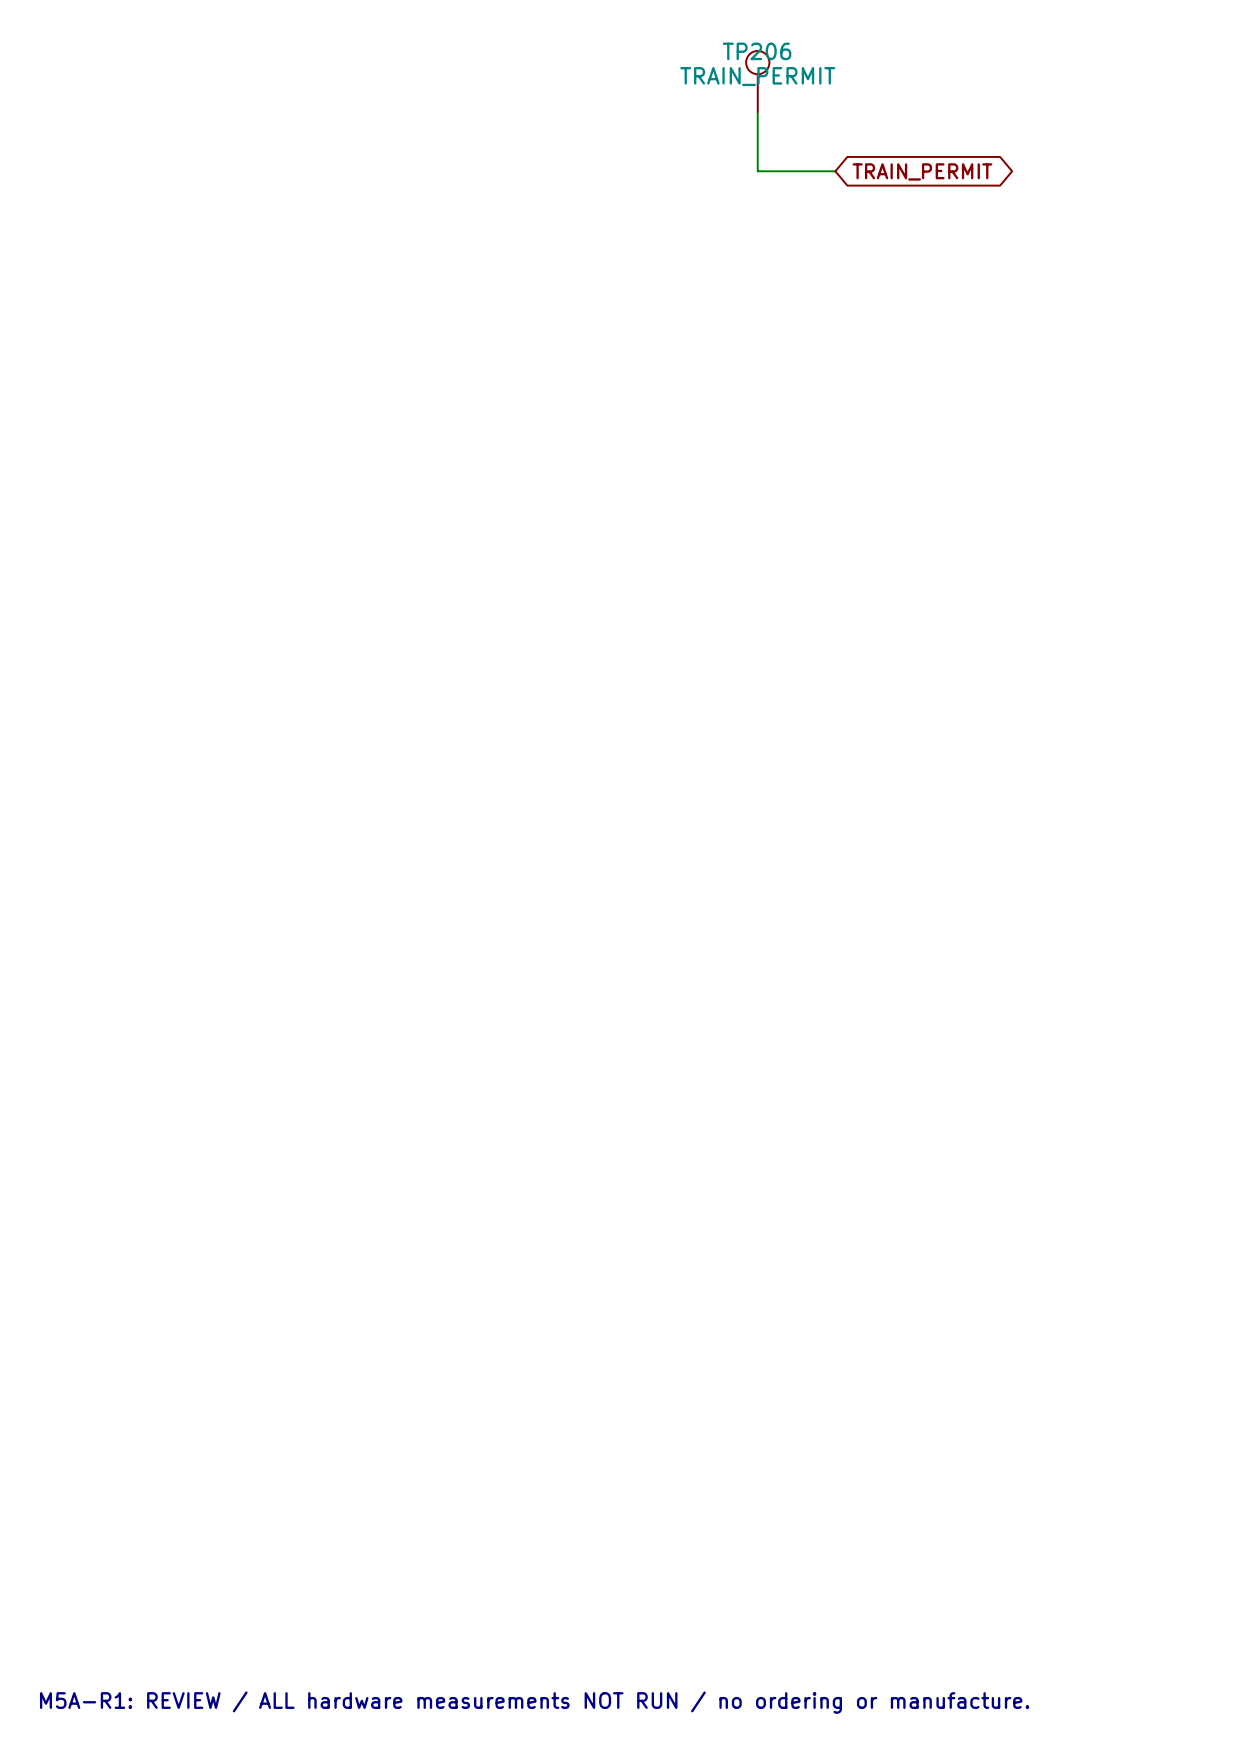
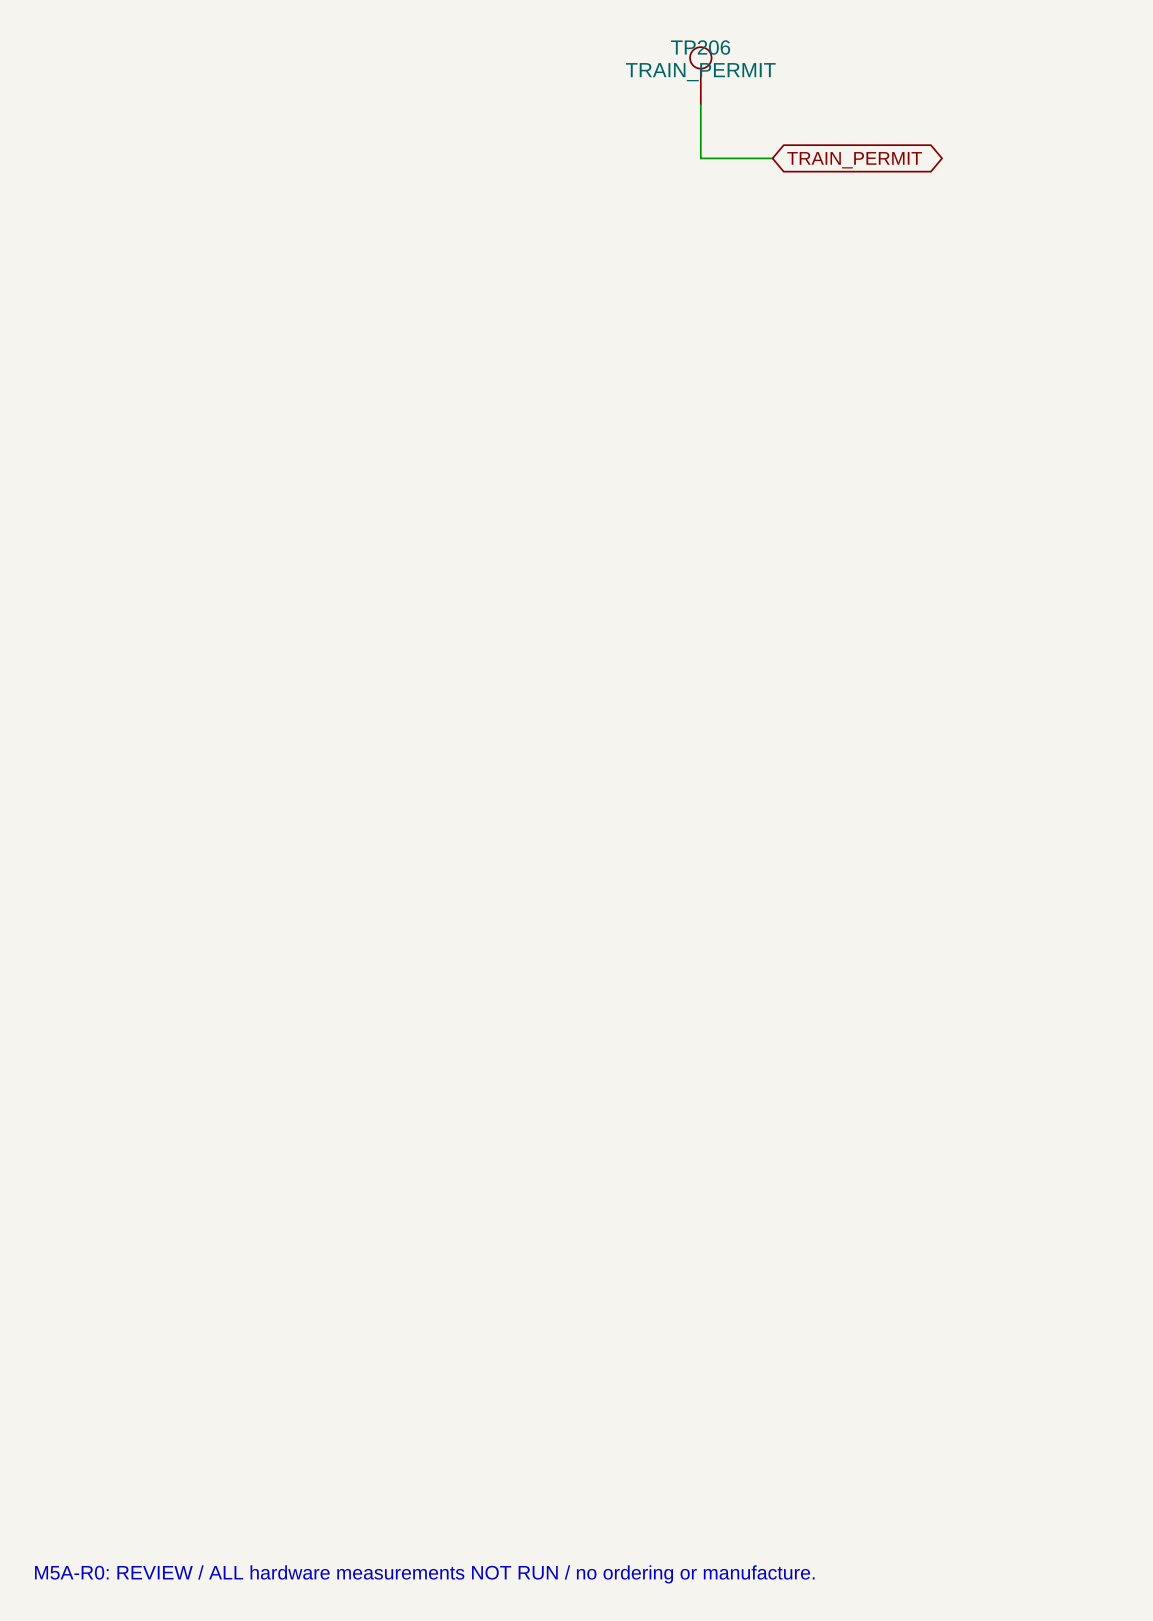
text: M5A-R1: REVIEW / ALL hardware measurements NOT RUN / no ordering or manufacture. (534, 1702) -> M5A-R0: REVIEW / ALL hardware measurements NOT RUN / no ordering or manufacture. (424, 1574)

